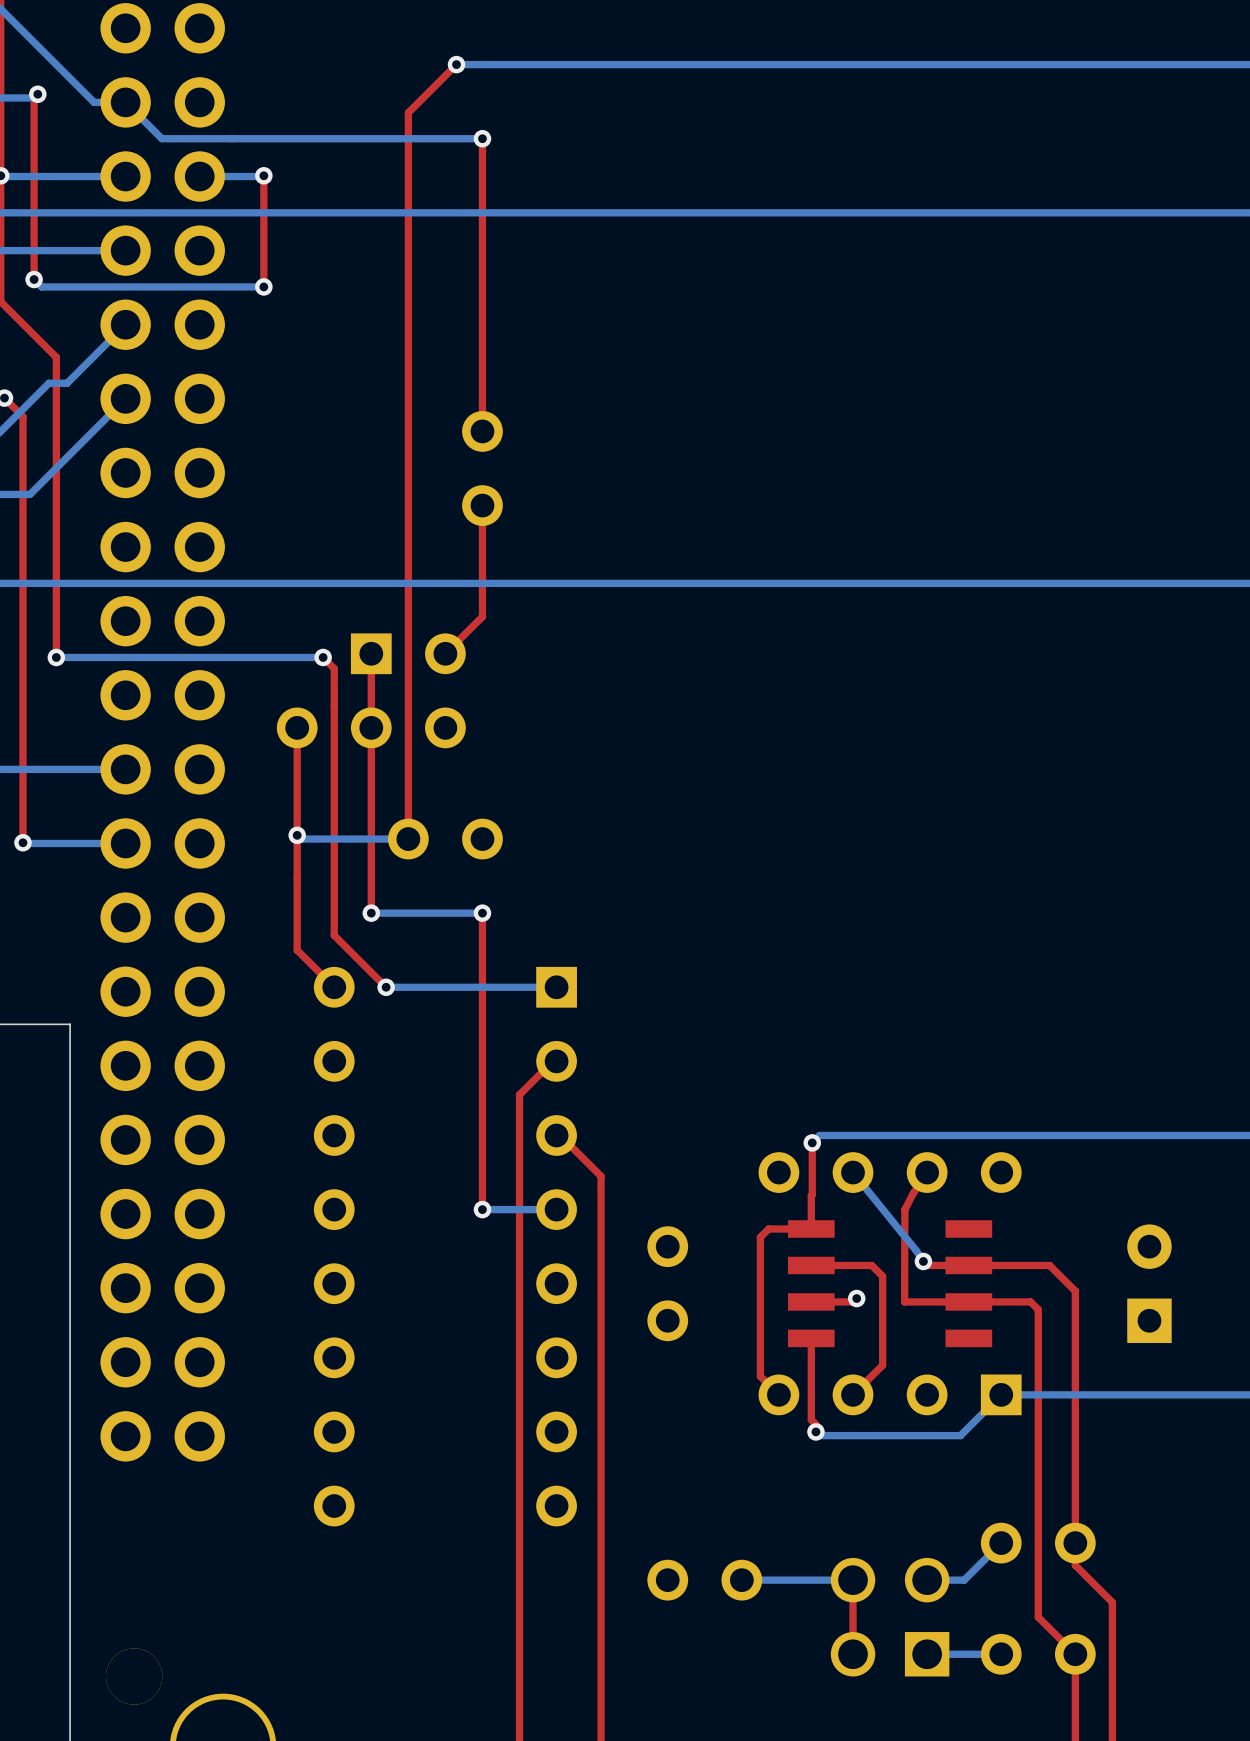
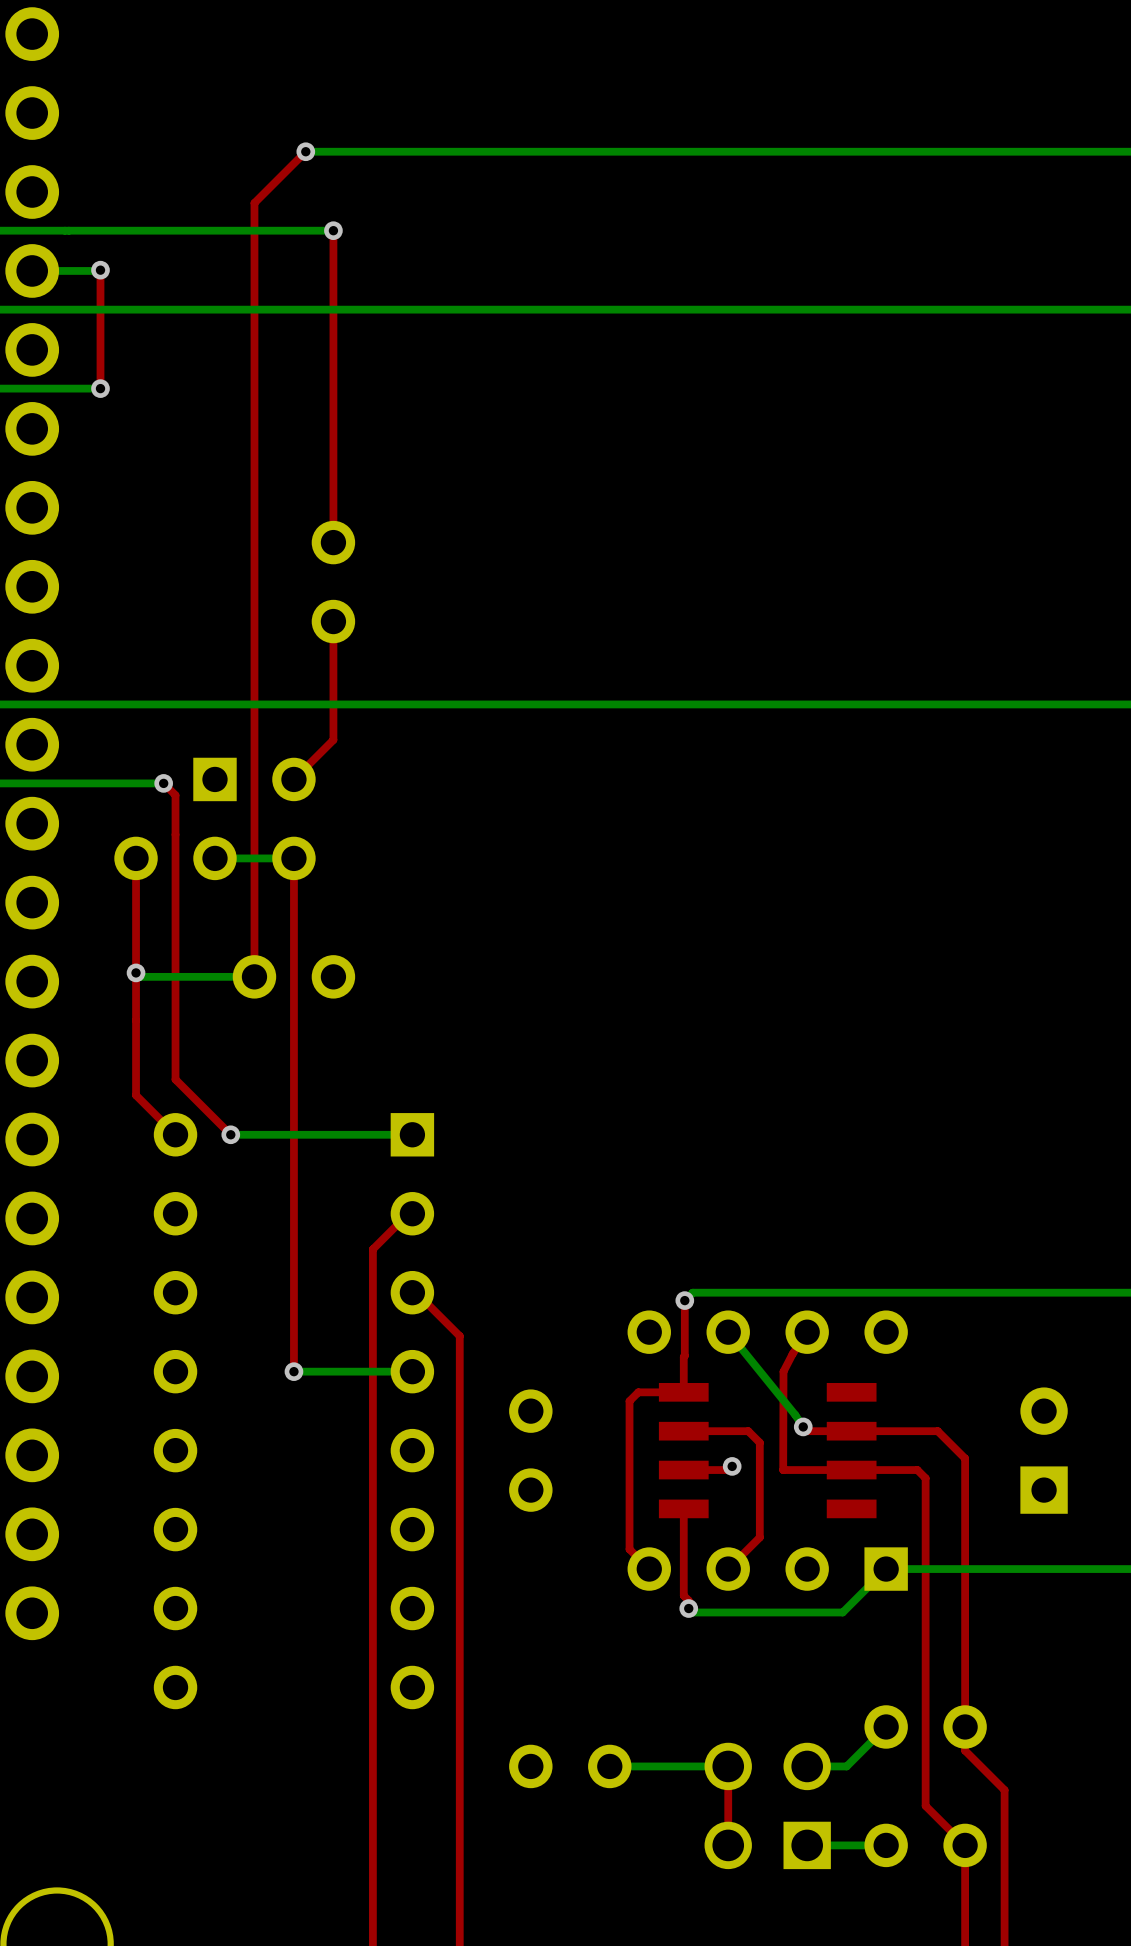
top track: (371, 653) (371, 913) -> none
bottom track: none -> (293, 858) (214, 858)
top track: none -> (293, 858) (293, 1371)
via: (371, 913) -> none
bottom track: (482, 913) (371, 913) -> none
top track: (482, 913) (482, 1209) -> none
via: (482, 913) -> none
bottom track: none -> (333, 1371) (293, 1371)
via position: (482, 1209) -> (293, 1371)

